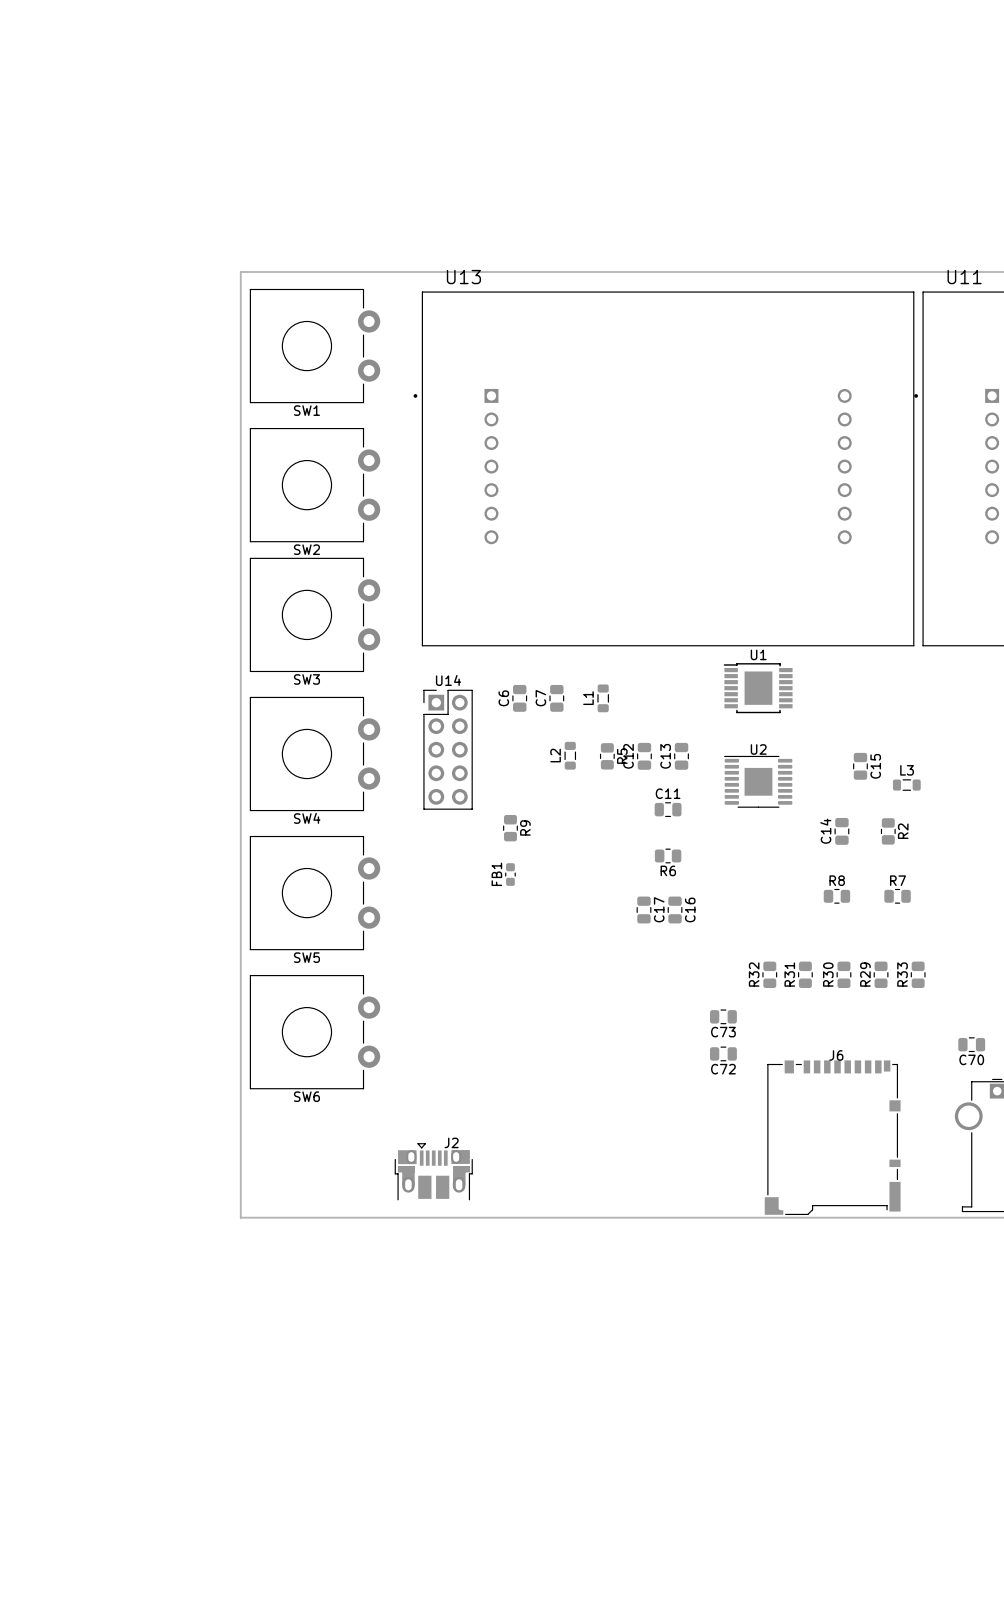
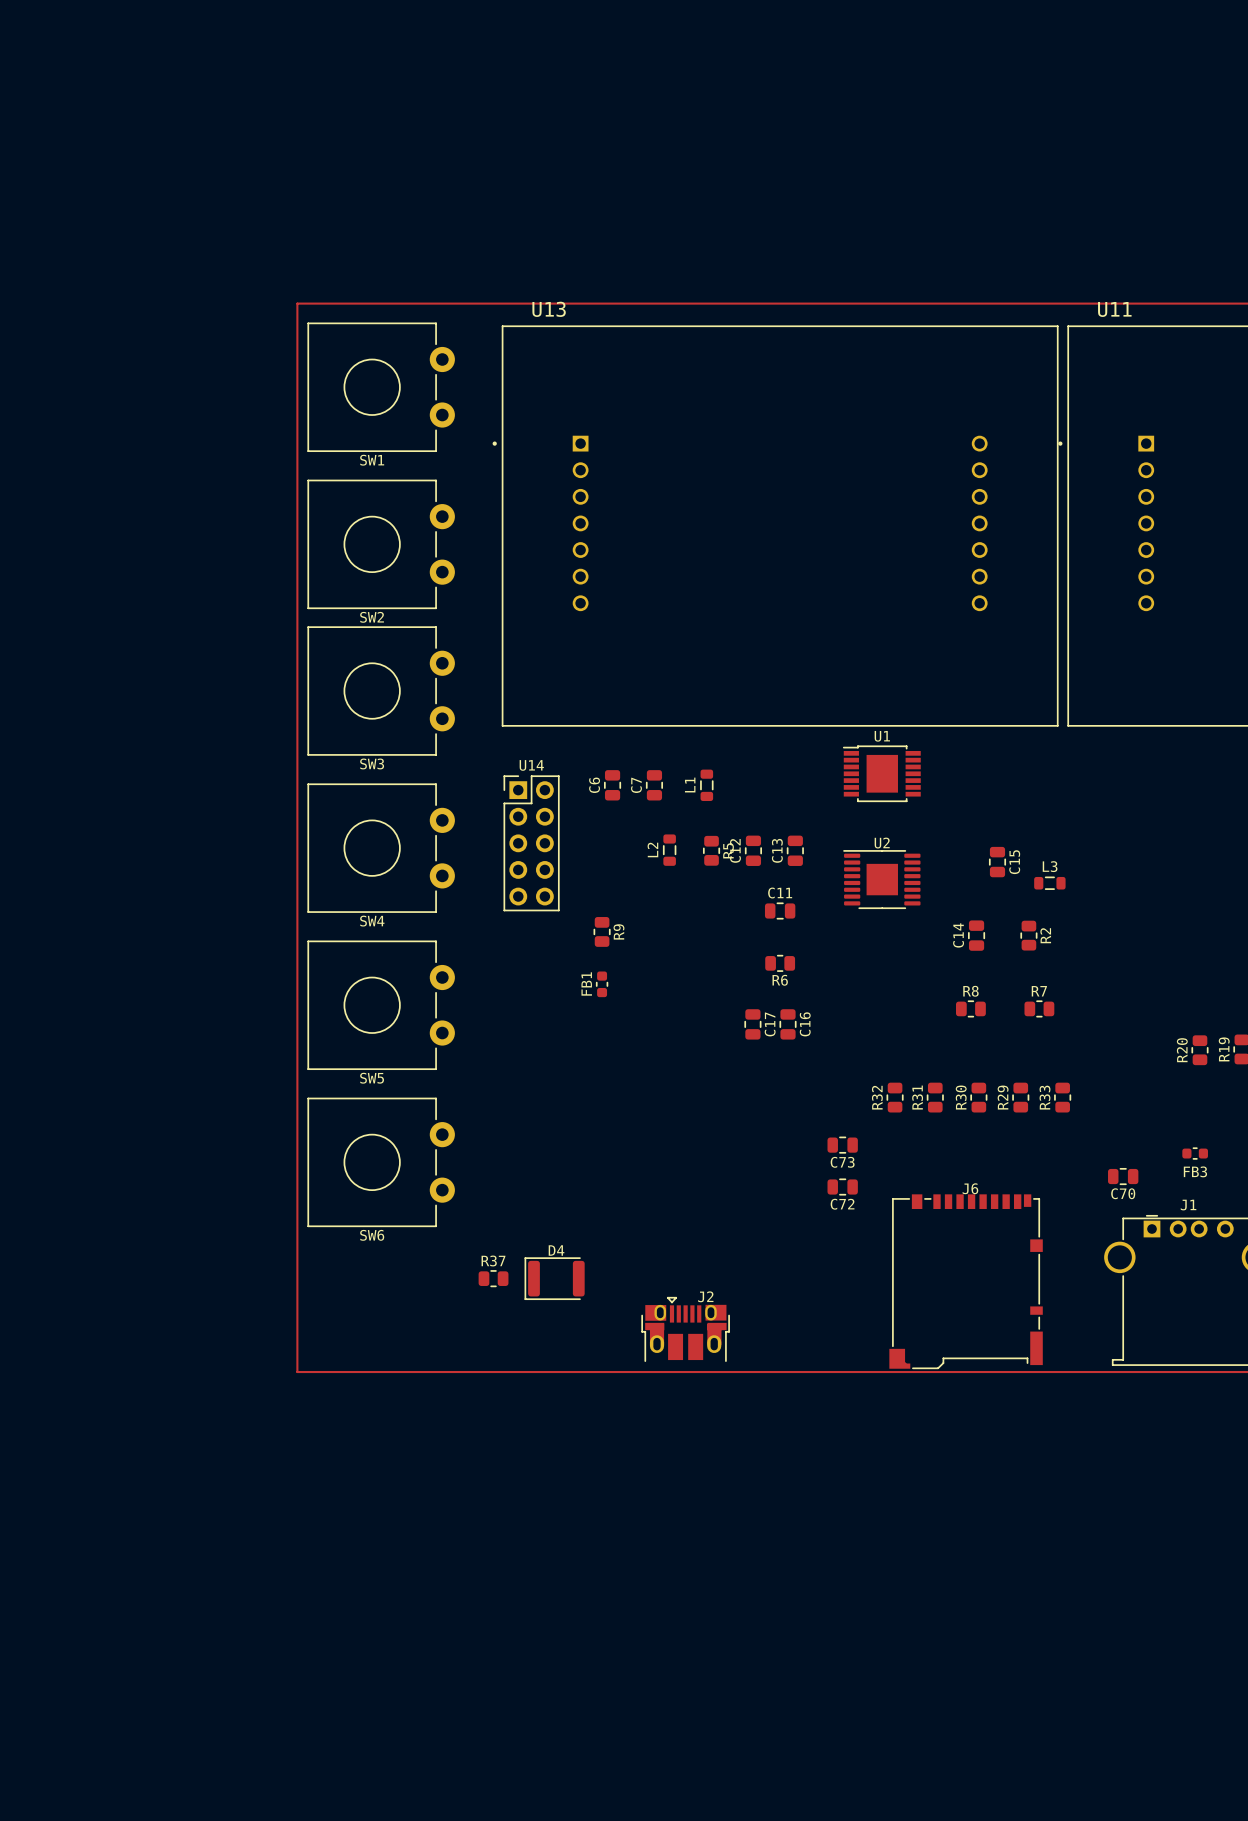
R37: none -> (493, 1278)
D4: none -> (554, 1278)
J2 position: (433, 1171) -> (685, 1329)

